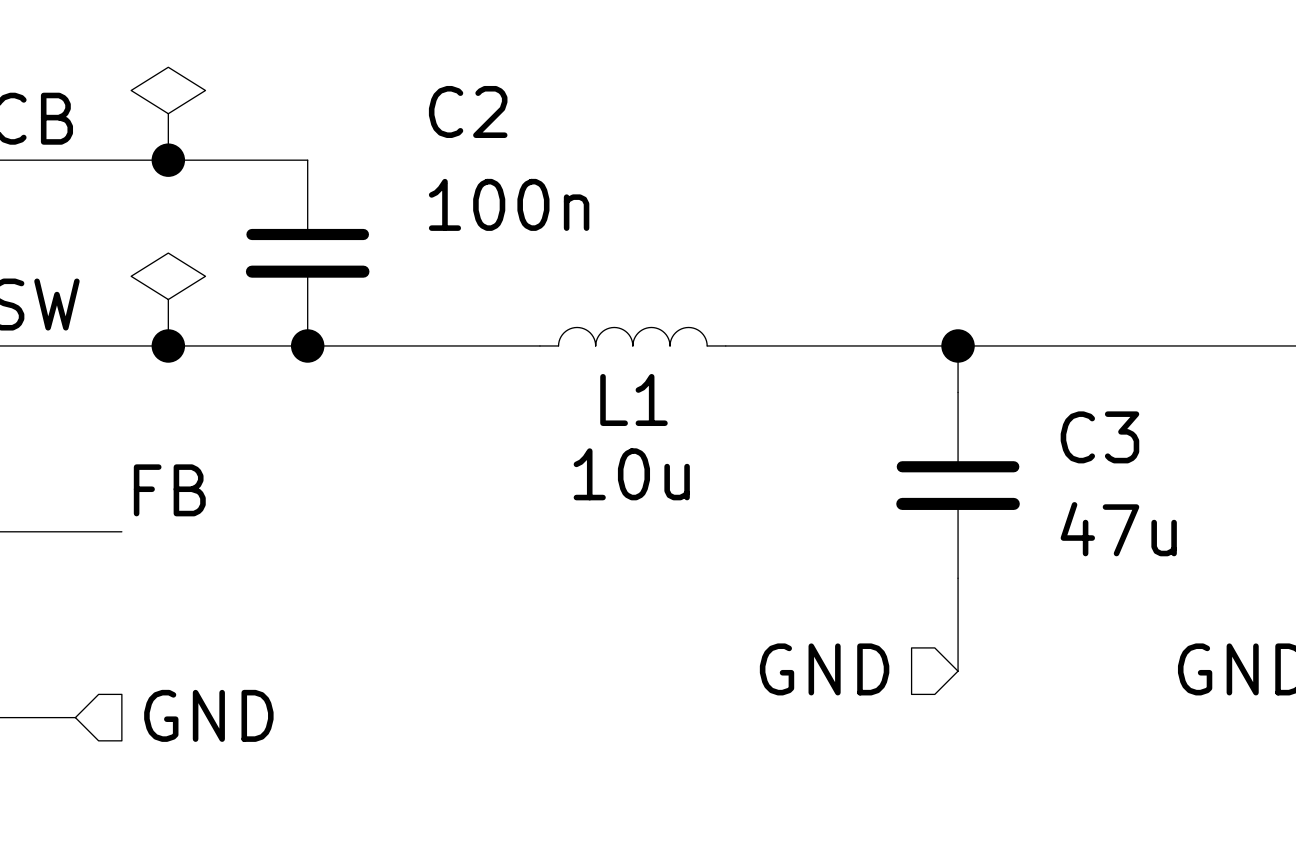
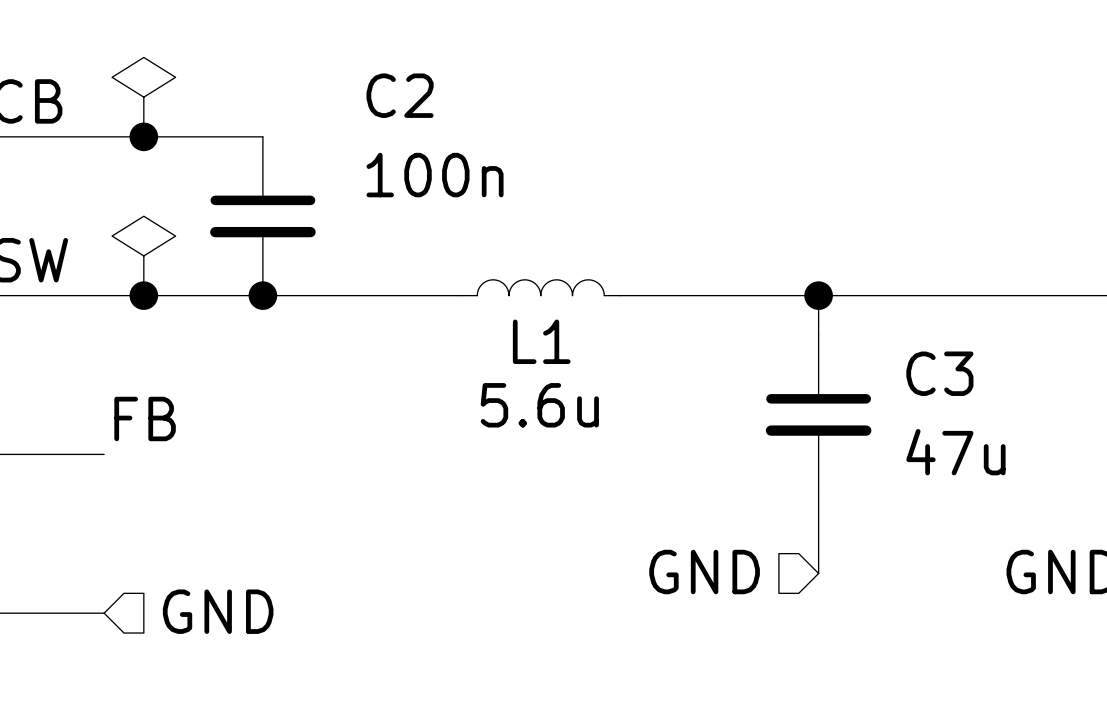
L1 value: 10u (631, 474) -> 5.6u (539, 405)
hierarchical label position: GND (208, 715) -> GND (218, 611)
wire: none -> (64, 613) (104, 613)

